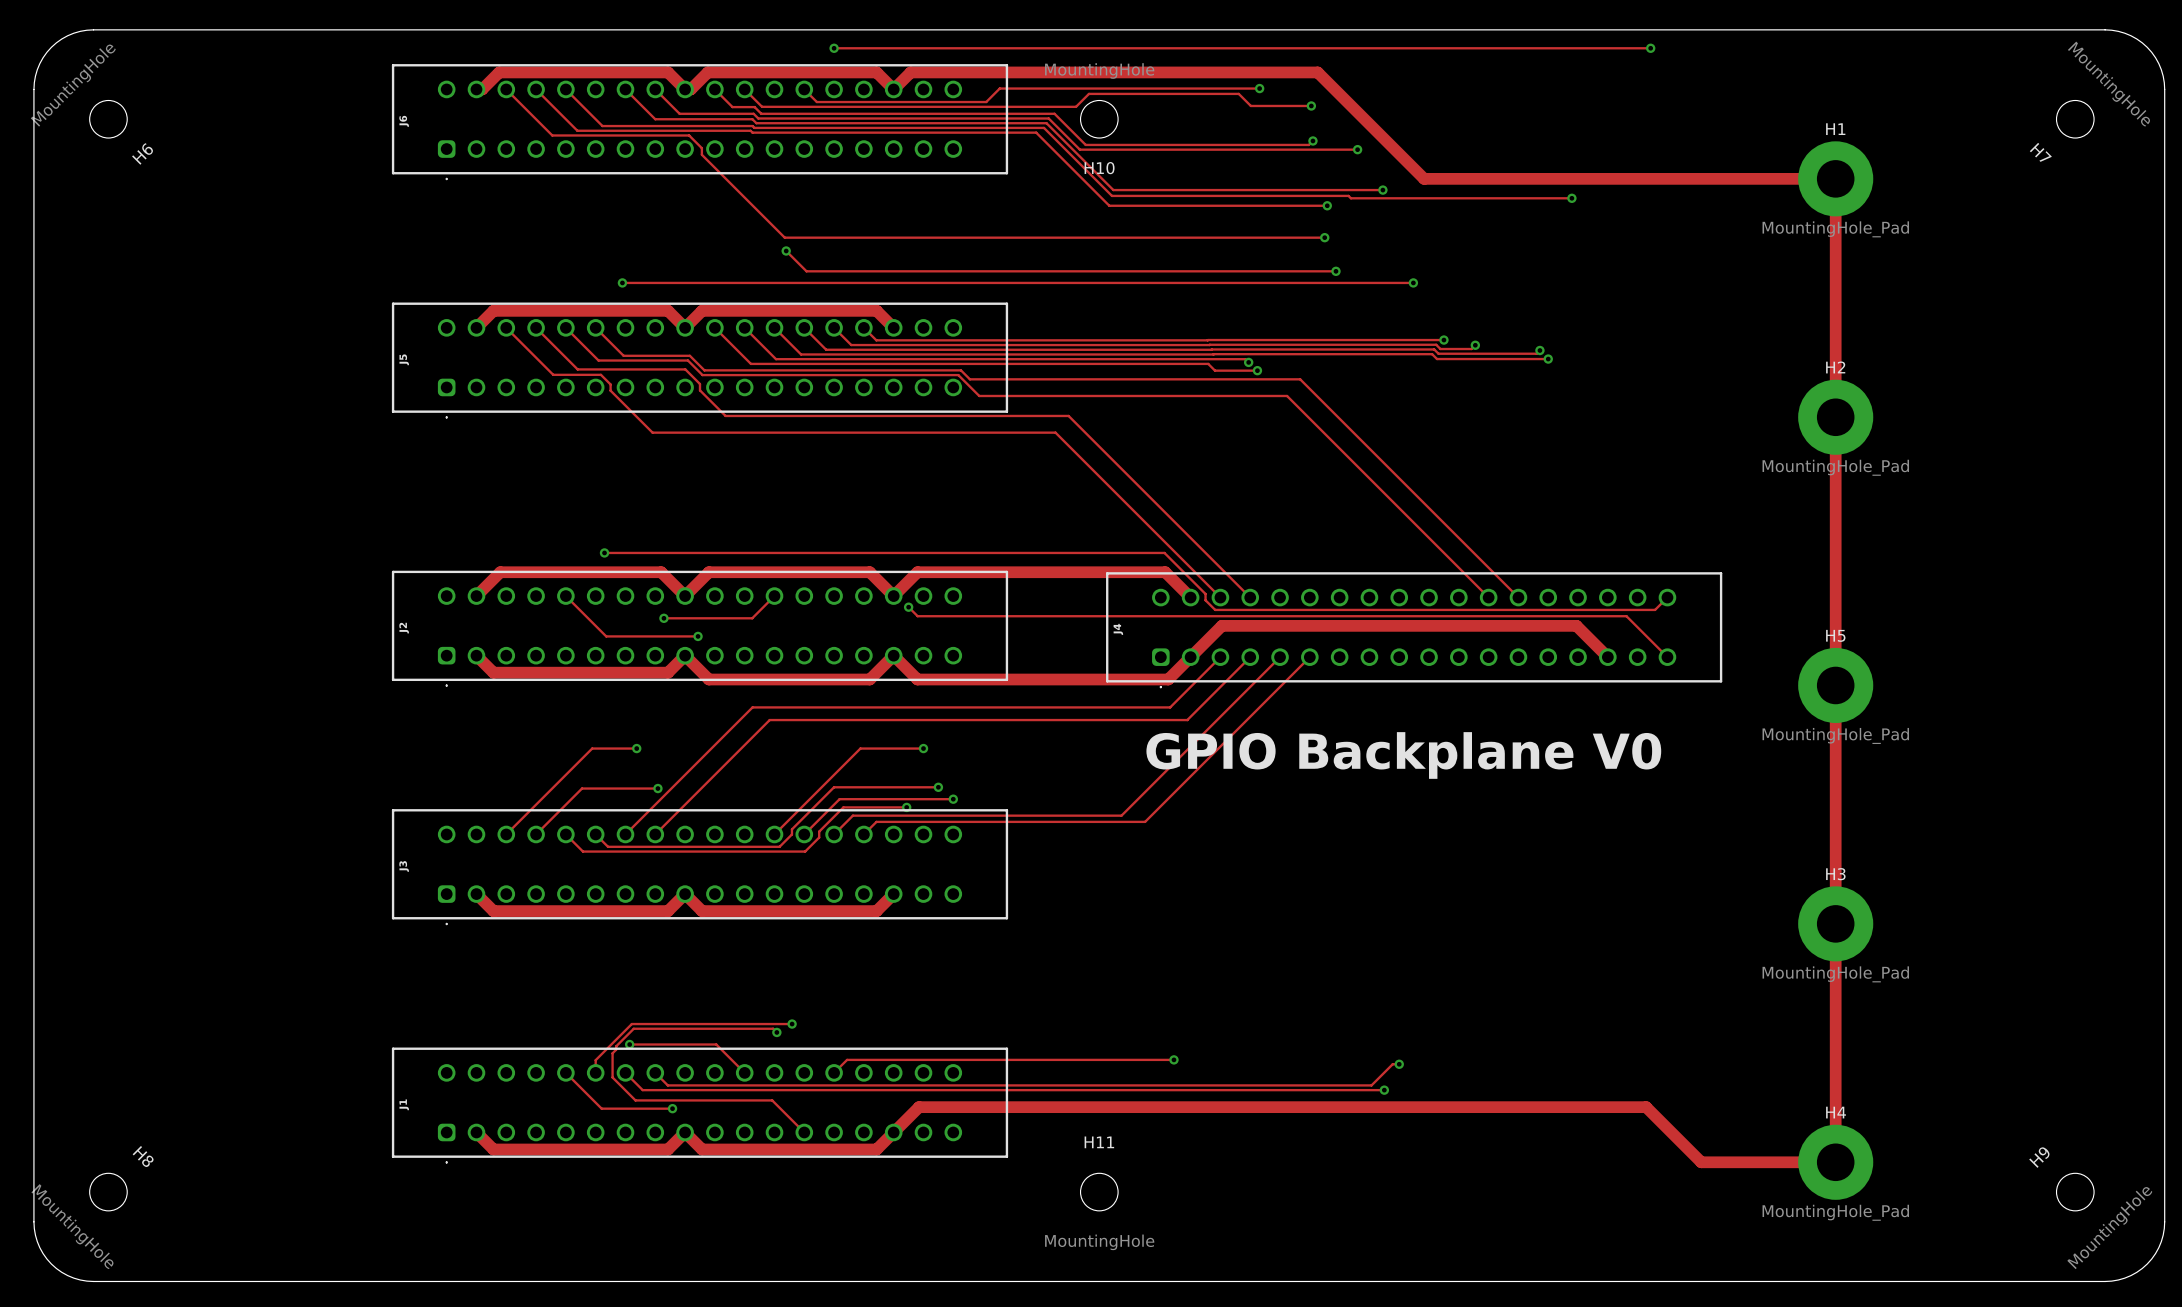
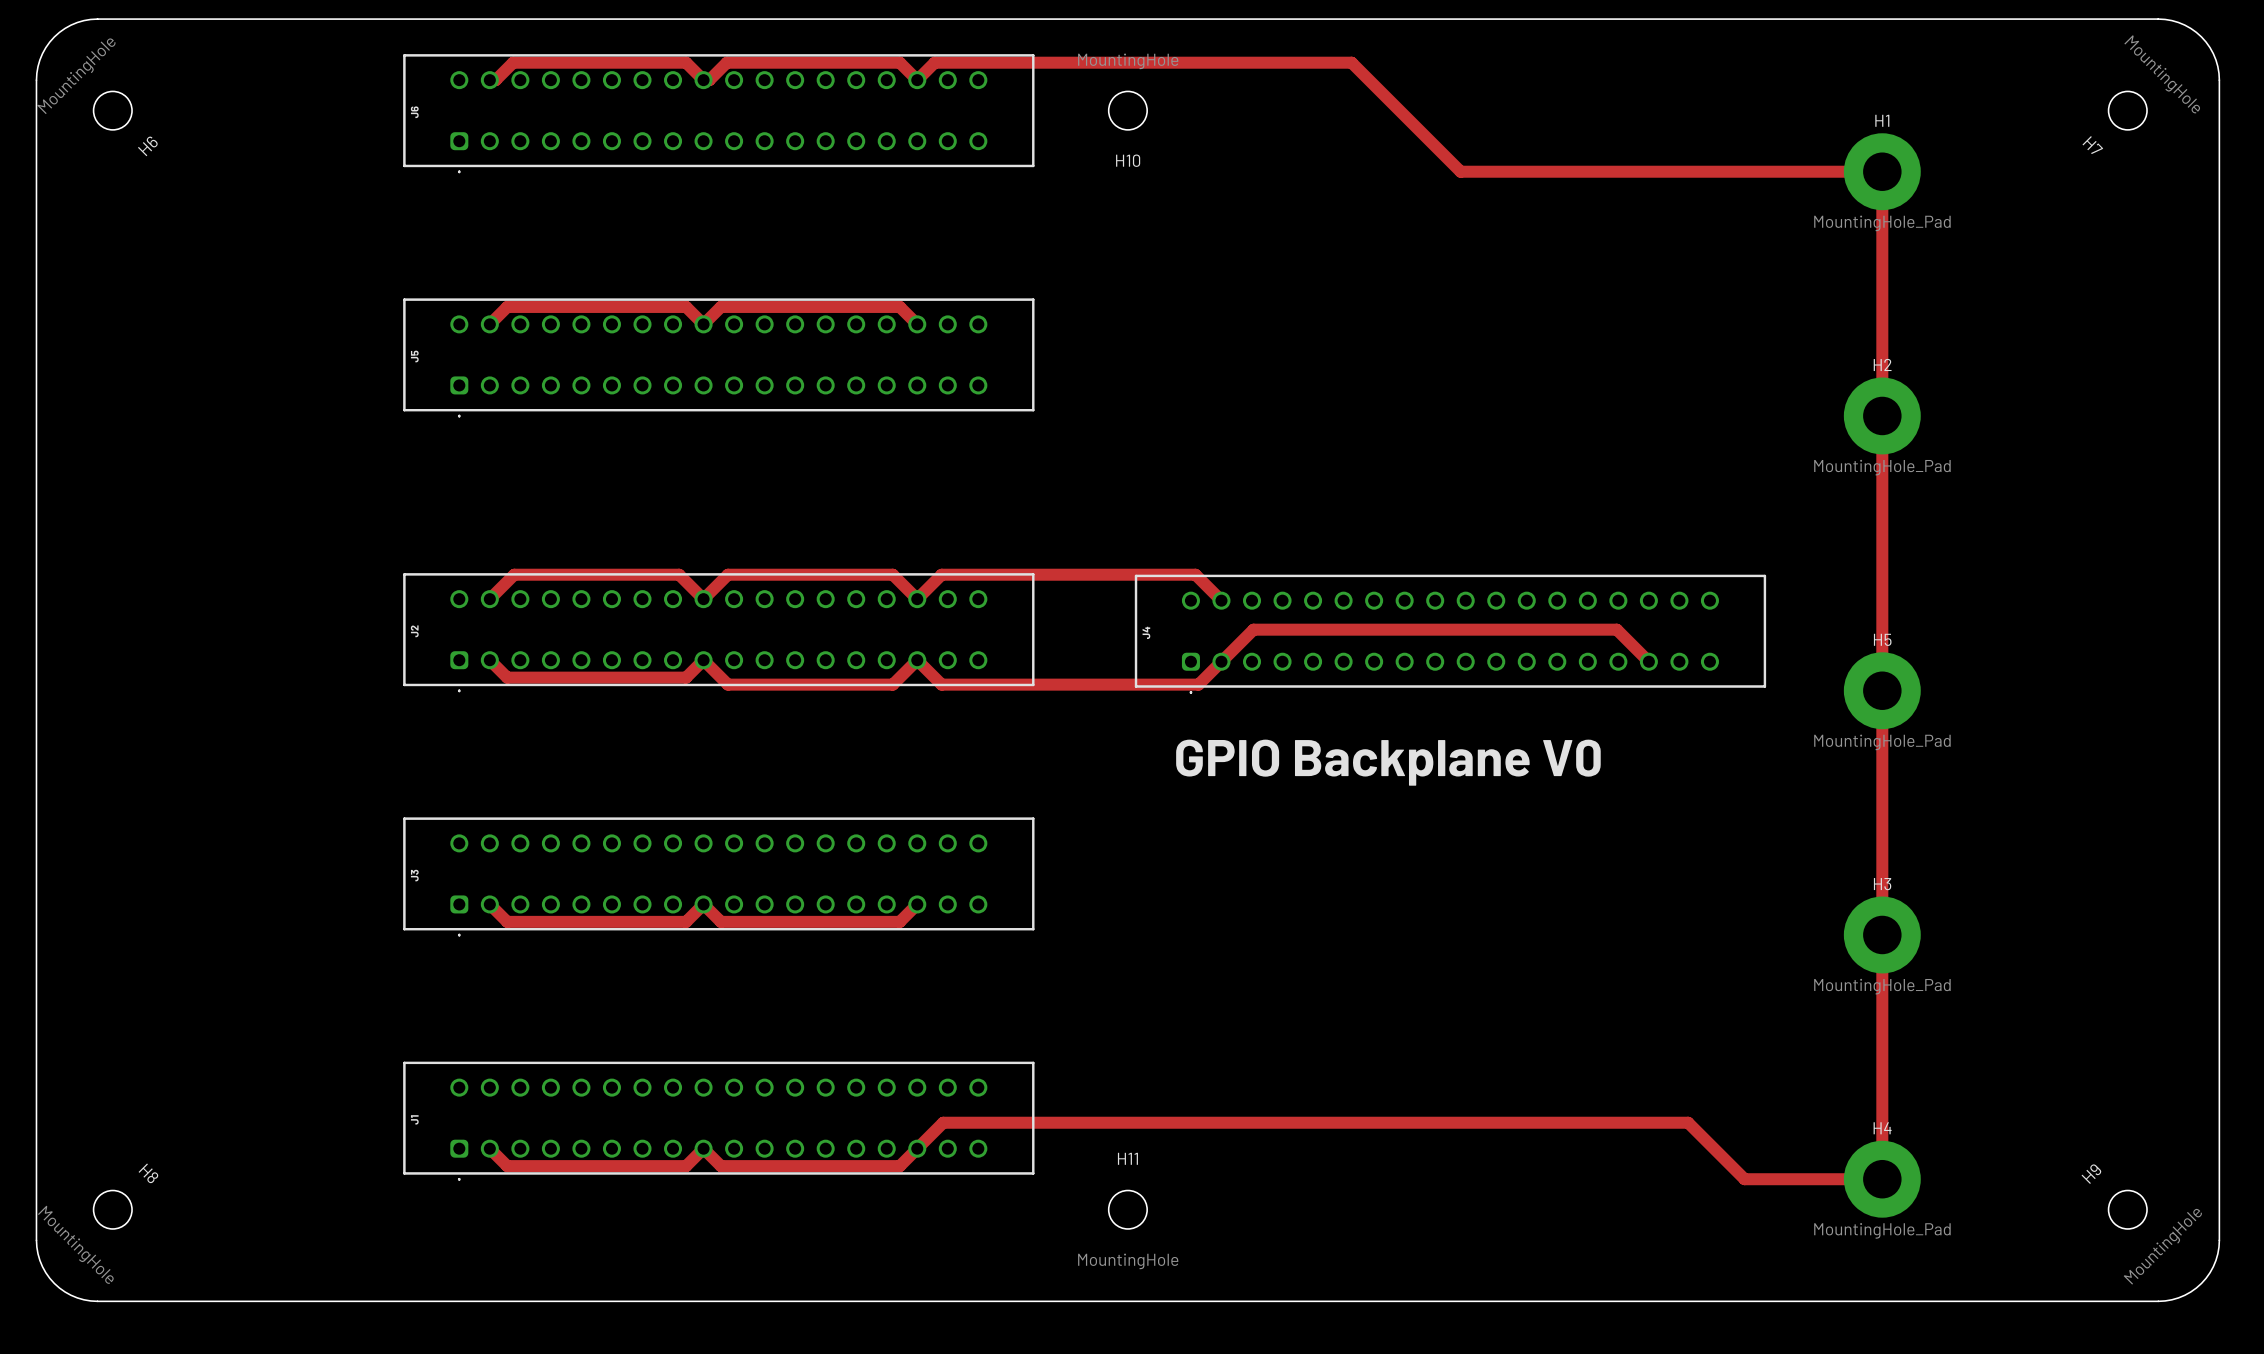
track: (834, 48) (1650, 48) -> none
via: (834, 48) -> none
via: (1650, 48) -> none
track: (1259, 88) (999, 88) (986, 102) (816, 102) (804, 89) -> none
via: (1259, 88) -> none
track: (506, 89) (552, 135) (689, 135) (701, 148) (701, 154) (784, 237) (1324, 237) -> none
track: (536, 89) (577, 130) (1036, 132) (1109, 205) (1327, 205) -> none
track: (565, 89) (602, 126) (1044, 127) (1111, 195) (1571, 198) -> none
track: (625, 89) (655, 119) (752, 119) (756, 123) (1046, 123) (1113, 190) (1382, 190) -> none
track: (655, 89) (679, 113) (753, 113) (758, 118) (1048, 118) (1079, 149) (1357, 149) -> none
track: (714, 89) (732, 107) (754, 107) (761, 113) (1054, 113) (1085, 144) (1308, 144) (1312, 140) -> none
track: (744, 89) (762, 106) (1076, 106) (1088, 93) (1238, 93) (1250, 105) (1311, 105) -> none
via: (1311, 105) -> none
via: (1312, 140) -> none
via: (1357, 149) -> none
via: (1382, 190) -> none
via: (1571, 198) -> none
via: (1327, 205) -> none
via: (1324, 237) -> none
track: (786, 250) (806, 271) (1335, 271) -> none
via: (786, 250) -> none
via: (1335, 271) -> none
track: (622, 282) (1413, 282) -> none
via: (622, 282) -> none
via: (1413, 282) -> none
track: (506, 327) (553, 374) (600, 374) (610, 384) (610, 390) (652, 432) (1055, 432) (1220, 597) -> none
track: (536, 327) (577, 369) (685, 369) (699, 384) (699, 390) (725, 415) (1068, 415) (1250, 597) -> none
track: (565, 327) (598, 360) (687, 360) (702, 375) (958, 375) (979, 395) (1287, 395) (1488, 597) -> none
track: (595, 327) (623, 355) (689, 355) (704, 370) (960, 370) (969, 379) (1300, 379) (1518, 597) -> none
track: (714, 327) (750, 363) (1208, 363) (1215, 370) (1257, 370) -> none
track: (744, 327) (776, 359) (1245, 359) (1248, 362) -> none
track: (774, 327) (801, 354) (1432, 354) (1437, 359) (1548, 359) -> none
track: (804, 327) (826, 349) (1434, 349) (1438, 353) (1536, 353) (1539, 350) -> none
track: (834, 327) (851, 345) (1436, 344) (1440, 349) (1471, 349) (1475, 345) -> none
track: (863, 327) (876, 340) (1443, 340) -> none
via: (1443, 340) -> none
via: (1475, 345) -> none
via: (1539, 350) -> none
via: (1548, 359) -> none
via: (1248, 362) -> none
via: (1257, 370) -> none
track: (604, 552) (1164, 552) (1205, 593) (1205, 600) (1215, 609) (1655, 609) (1667, 597) -> none
via: (604, 552) -> none
track: (565, 596) (606, 636) (698, 636) -> none
track: (774, 596) (752, 618) (663, 618) -> none
track: (908, 607) (917, 616) (1626, 616) (1667, 657) -> none
via: (908, 607) -> none
via: (663, 618) -> none
via: (698, 636) -> none
track: (1220, 657) (1170, 707) (752, 707) (625, 834) -> none
track: (1250, 657) (1187, 720) (769, 720) (655, 834) -> none
track: (1280, 657) (1121, 815) (852, 815) (834, 834) -> none
track: (1309, 657) (1145, 821) (876, 821) (863, 834) -> none
track: (636, 748) (592, 748) (506, 834) -> none
via: (636, 748) -> none
track: (923, 748) (860, 748) (774, 834) -> none
via: (923, 748) -> none
track: (938, 787) (834, 787) (791, 829) (791, 834) (779, 846) (608, 846) (595, 834) -> none
via: (938, 787) -> none
track: (657, 788) (582, 788) (536, 834) -> none
via: (657, 788) -> none
track: (953, 799) (839, 799) (804, 834) -> none
via: (953, 799) -> none
track: (906, 807) (843, 807) (819, 831) (819, 837) (805, 851) (582, 851) (565, 834) -> none
via: (906, 807) -> none
track: (792, 1024) (631, 1024) (595, 1060) (595, 1072) -> none
via: (792, 1024) -> none
track: (776, 1032) (773, 1028) (633, 1028) (616, 1046) (616, 1049) (612, 1053) (612, 1077) (635, 1100) (772, 1100) (804, 1132) -> none
via: (776, 1032) -> none
track: (629, 1044) (716, 1044) (744, 1072) -> none
via: (629, 1044) -> none
track: (1173, 1059) (847, 1059) (834, 1072) -> none
via: (1173, 1059) -> none
track: (1399, 1064) (1392, 1064) (1371, 1085) (667, 1085) (655, 1072) -> none
via: (1399, 1064) -> none
track: (565, 1072) (601, 1108) (672, 1108) -> none
track: (625, 1072) (642, 1090) (1384, 1090) -> none
via: (1384, 1090) -> none
via: (672, 1108) -> none

